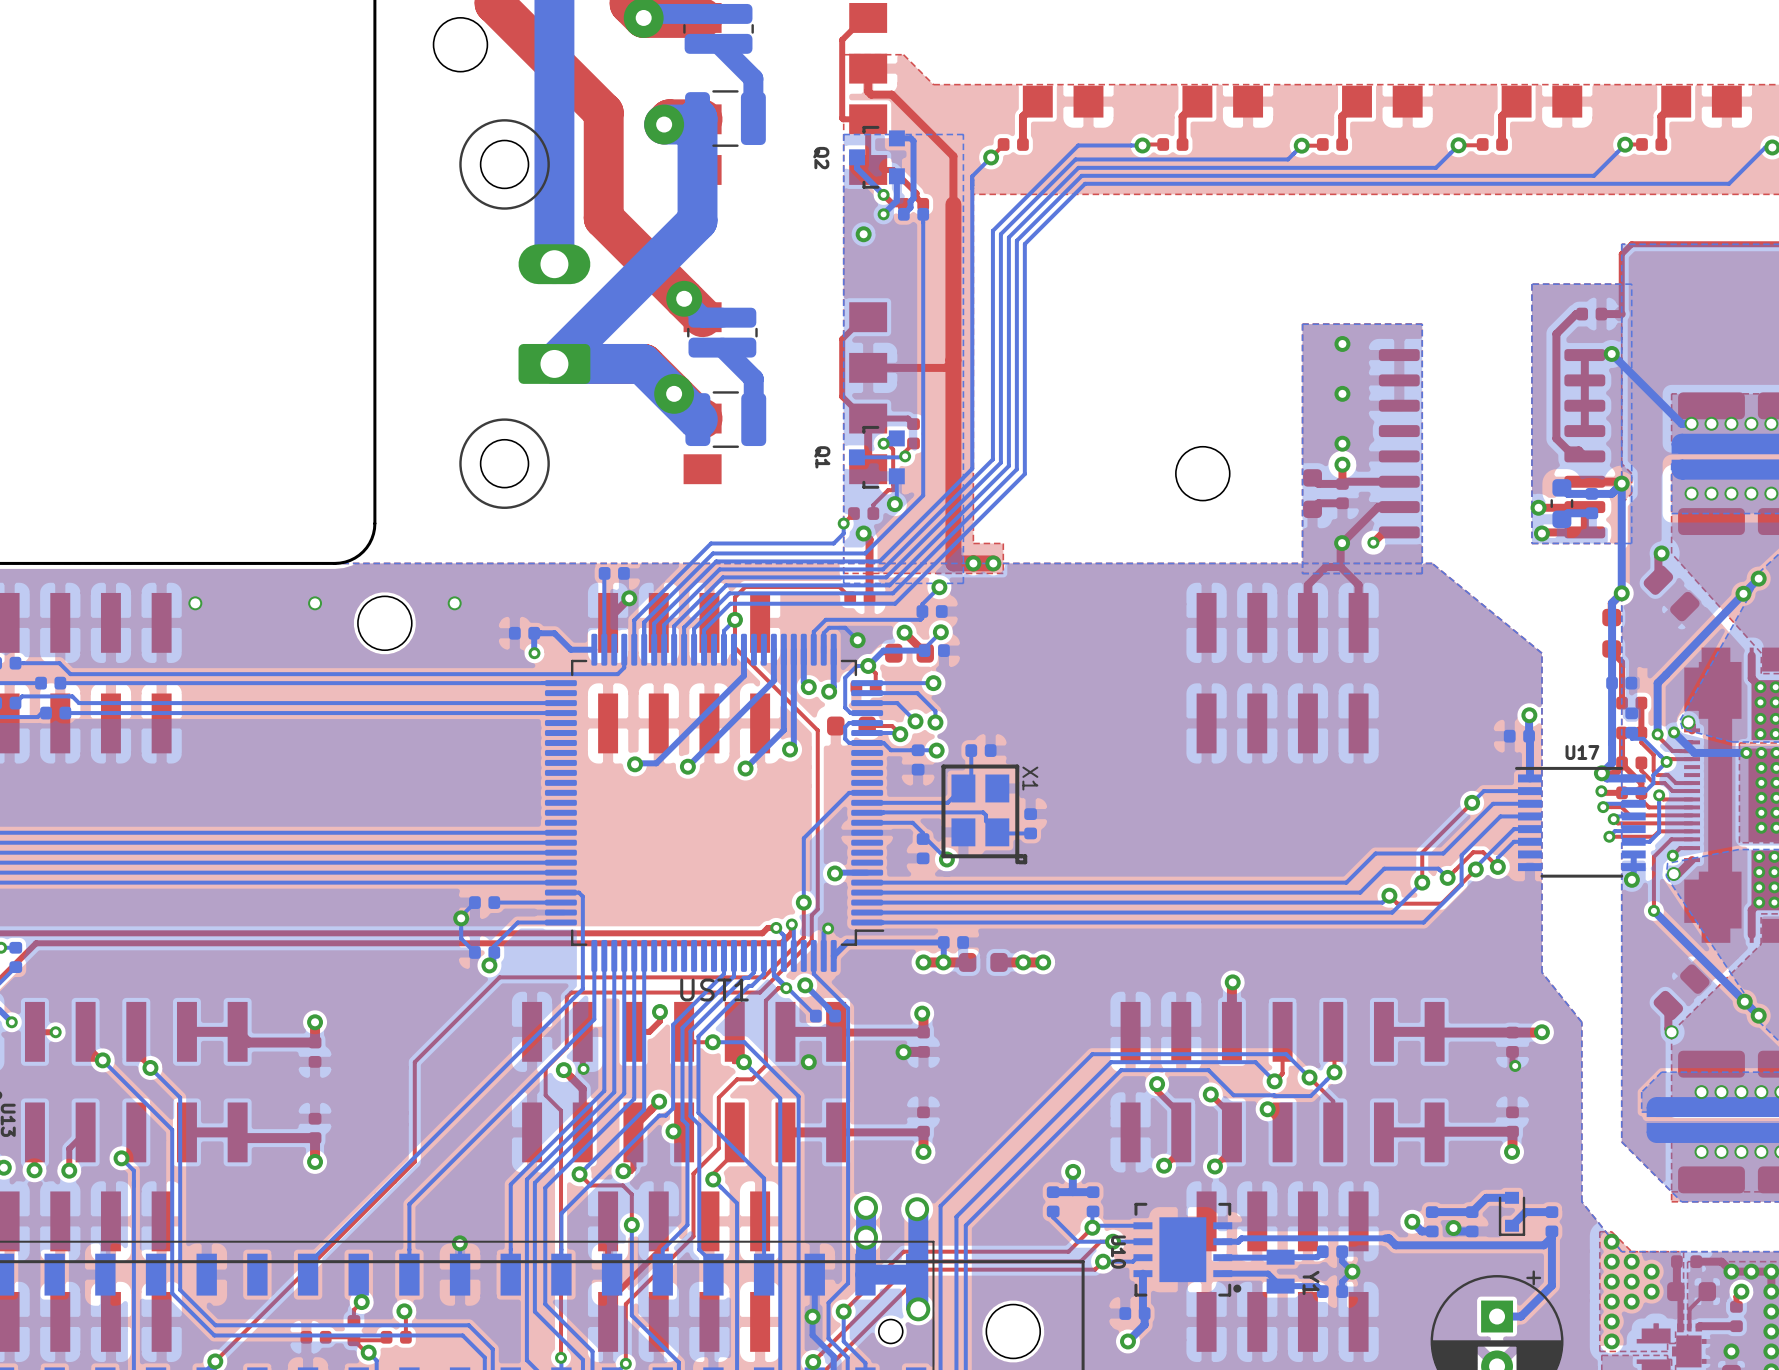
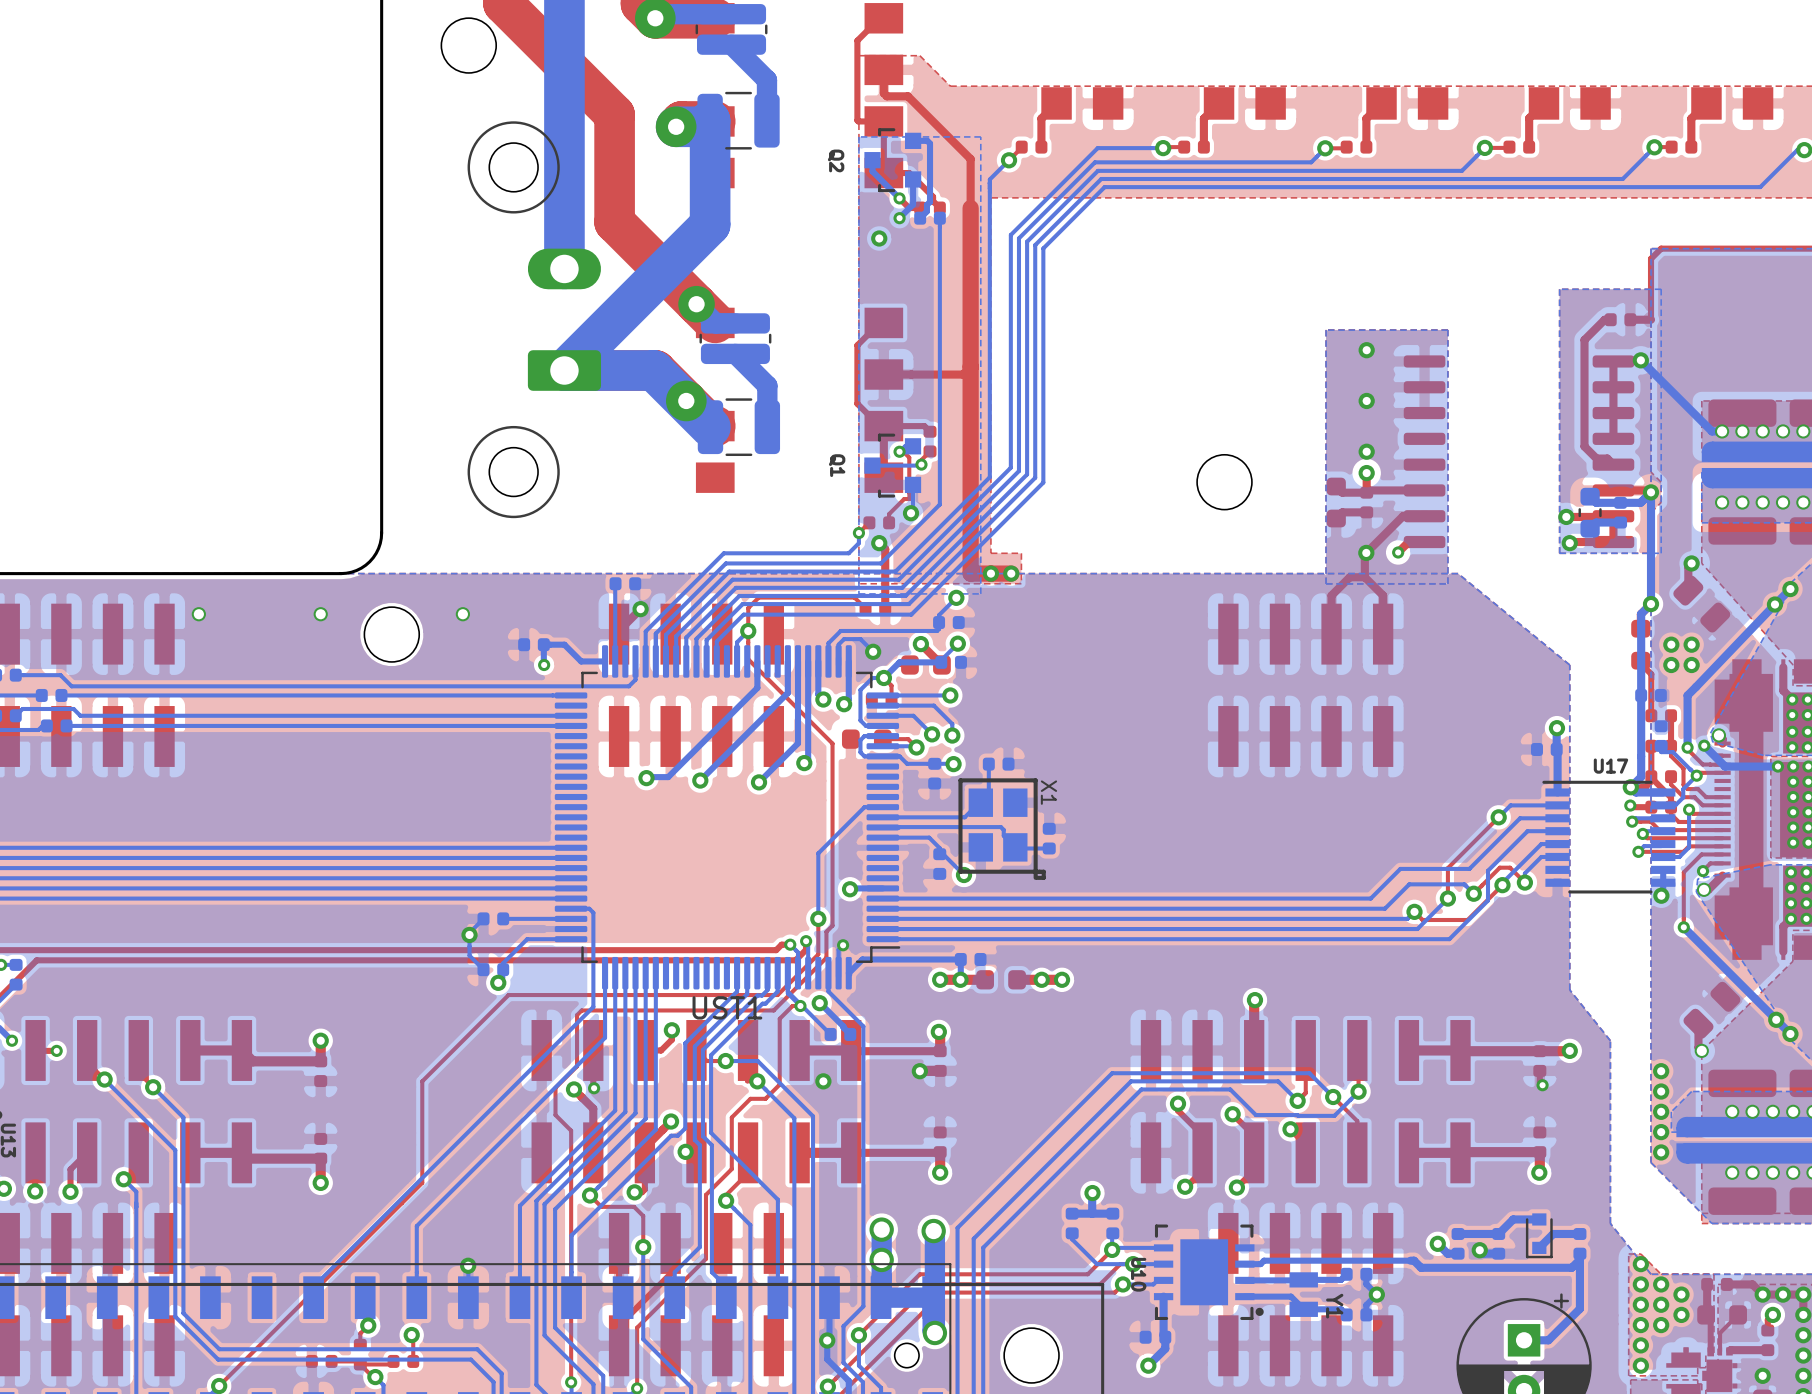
via: none -> (1671, 644)
via: none -> (1691, 644)
via: none -> (1671, 665)
via: none -> (1691, 665)
via: none -> (1661, 1071)
via: none -> (1661, 1091)
via: none -> (1661, 1111)
via: none -> (1661, 1132)
via: none -> (1661, 1152)

